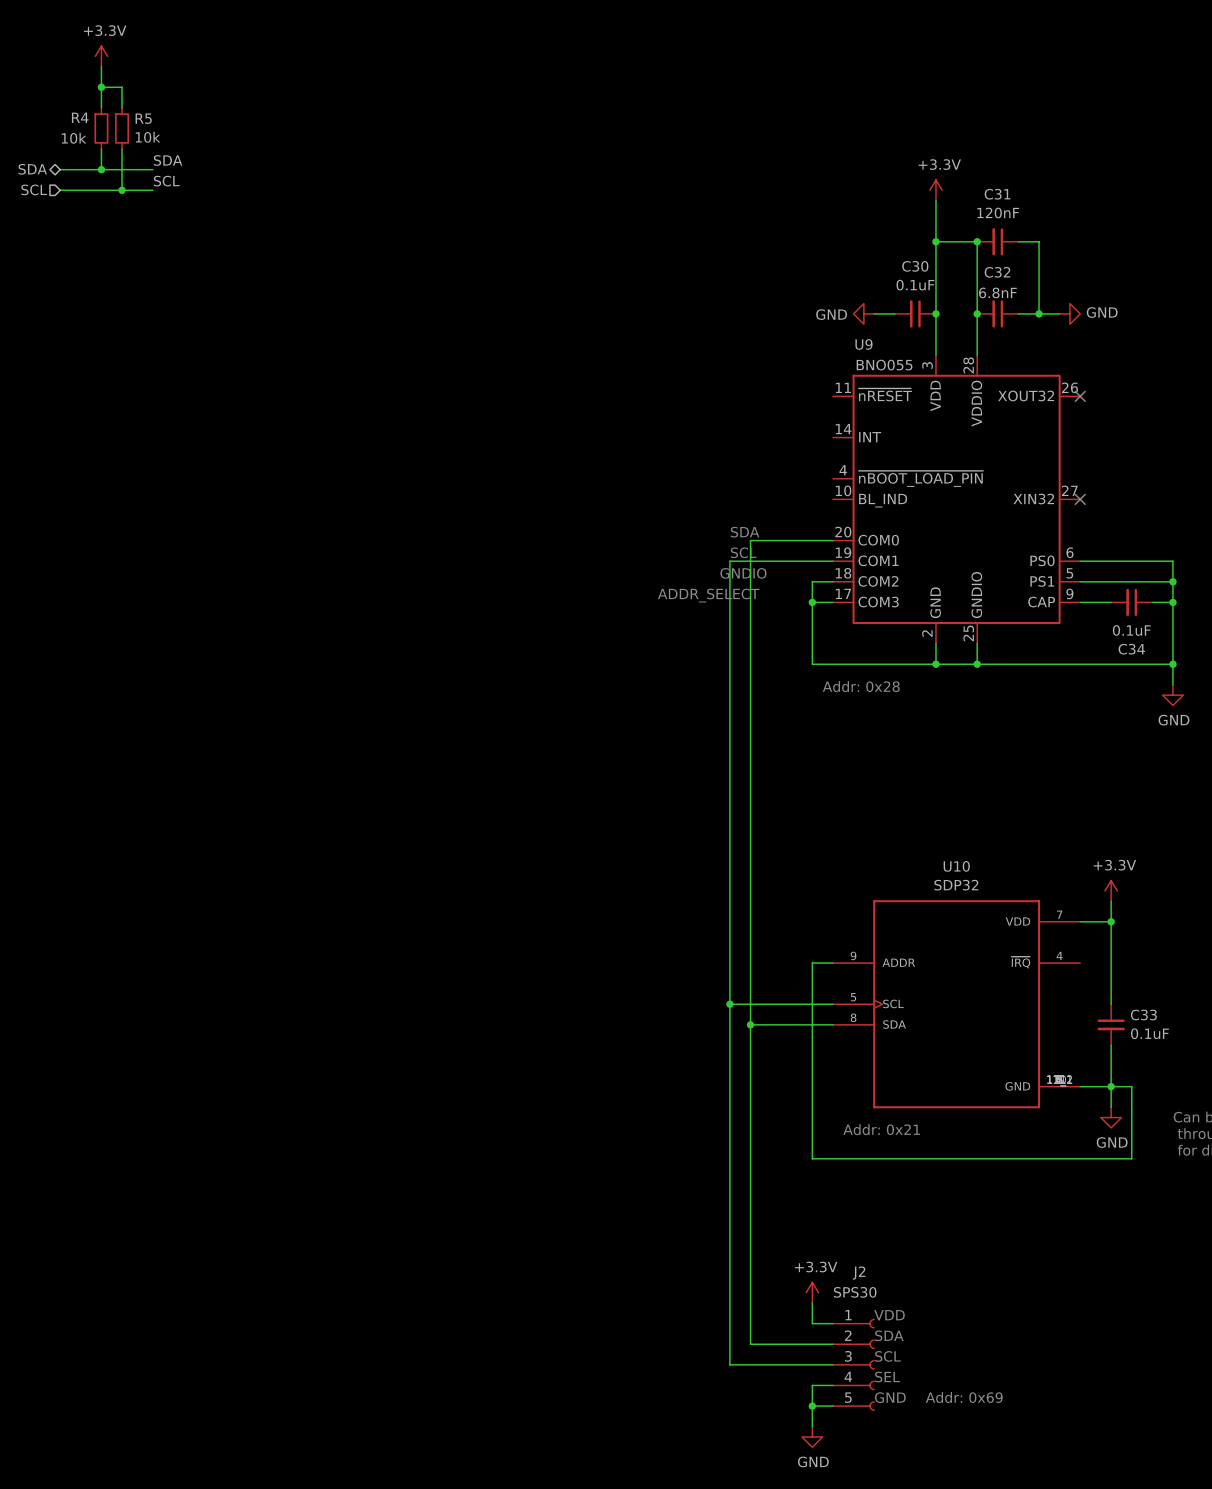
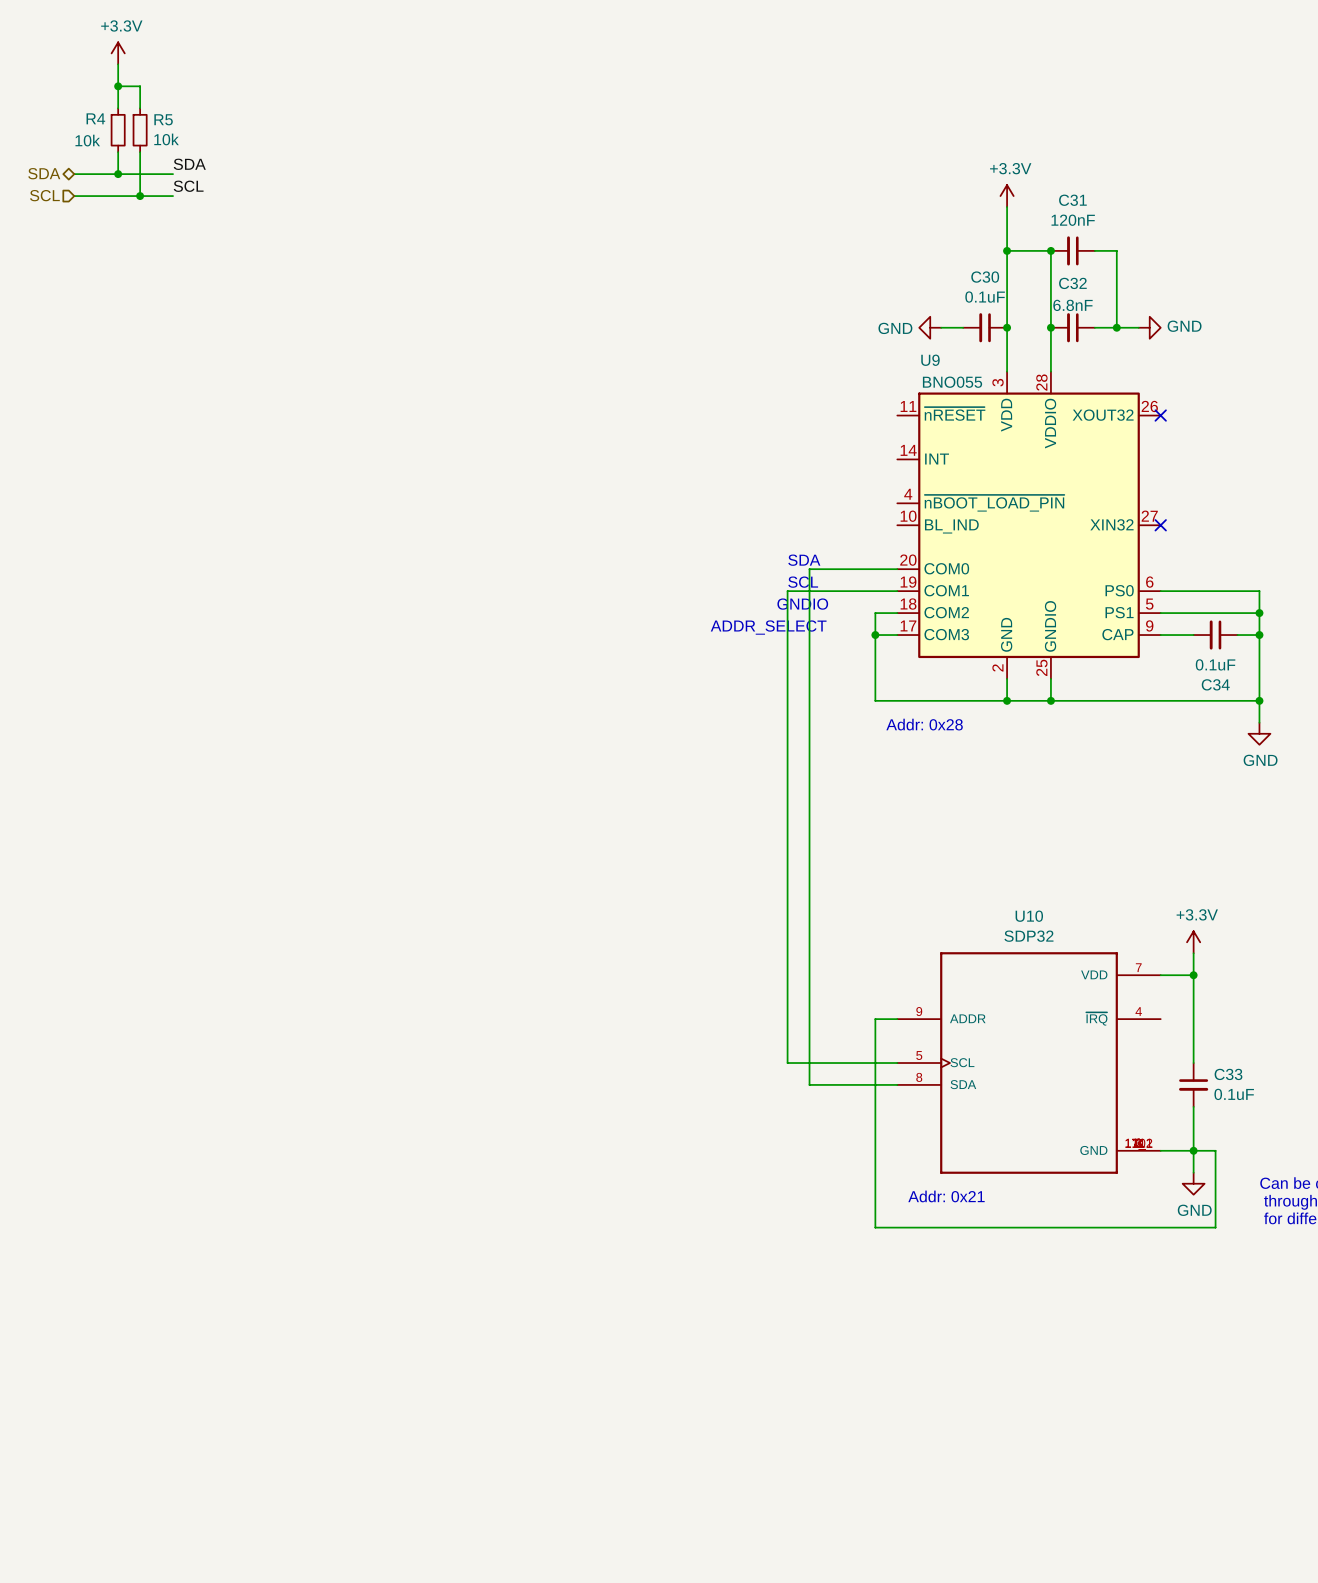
wire: (729, 1004) (729, 1364) (832, 1364) -> none
junction: (729, 1004) -> none
wire: (750, 1024) (750, 1344) (832, 1344) -> none
junction: (750, 1024) -> none
power symbol: +3.3V (812, 1292) -> none
wire: (812, 1303) (812, 1323) (832, 1323) -> none
text: VDD (889, 1315) -> none
text: SDA (889, 1335) -> none
text: SCL (887, 1356) -> none
J2: SPS30 (853, 1364) -> none
text: SEL (887, 1377) -> none
wire: (832, 1385) (812, 1385) (812, 1426) -> none
text: GND (890, 1397) -> none
text: Addr: 0x69 (964, 1397) -> none
wire: (812, 1406) (832, 1406) -> none
junction: (812, 1406) -> none
power symbol: GND (812, 1436) -> none

